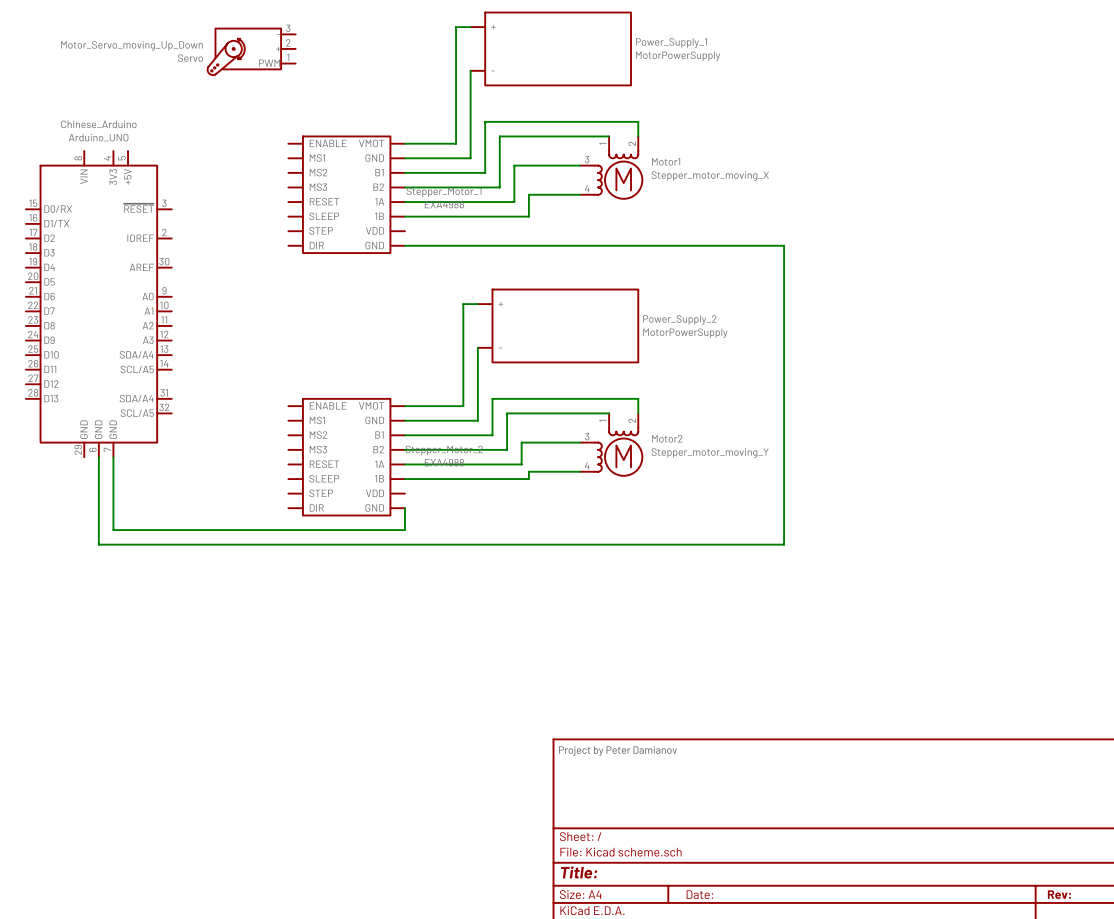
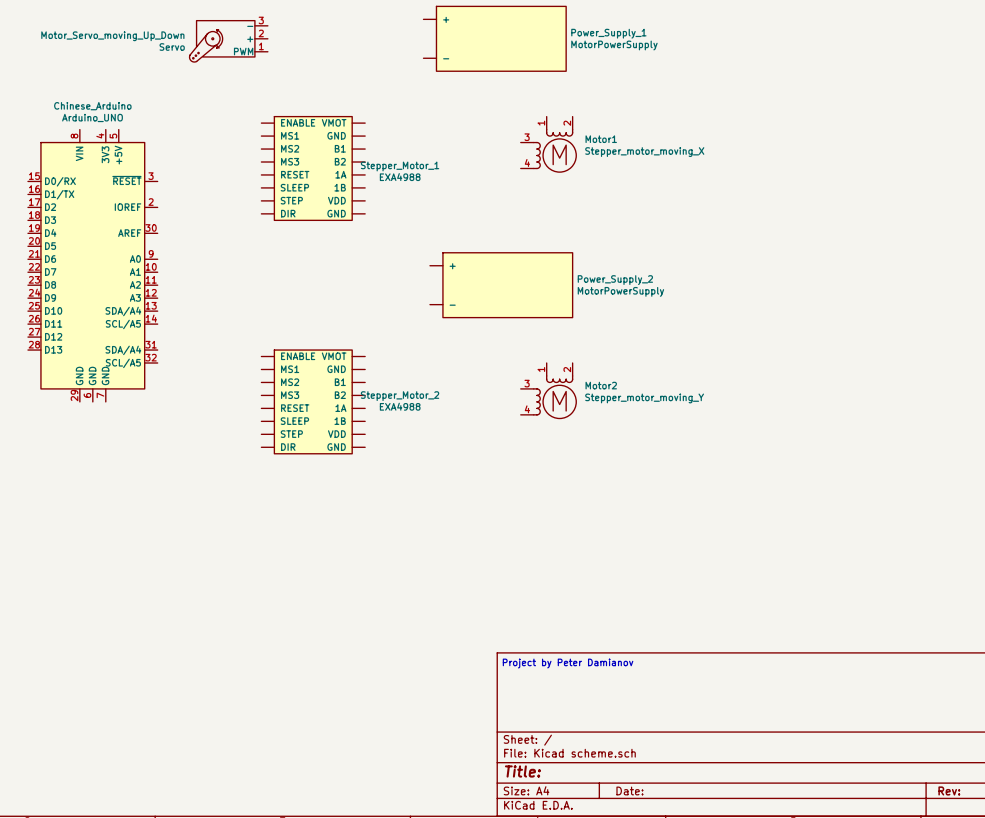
wire: (470, 27) (456, 27) (456, 143) (405, 143) -> none
wire: (470, 70) (470, 158) (405, 158) -> none
wire: (609, 136) (499, 136) (499, 187) (405, 187) -> none
wire: (638, 136) (638, 121) (485, 121) (485, 172) (405, 172) -> none
wire: (579, 165) (514, 165) (514, 202) (405, 202) -> none
wire: (579, 194) (528, 194) (528, 216) (405, 216) -> none
wire: (405, 245) (784, 245) (784, 544) (98, 544) (98, 457) -> none
wire: (477, 304) (463, 304) (463, 406) (405, 406) -> none
wire: (477, 347) (477, 420) (405, 420) -> none
wire: (609, 413) (507, 413) (507, 449) (405, 449) -> none
wire: (638, 413) (638, 398) (492, 398) (492, 435) (405, 435) -> none
wire: (579, 442) (521, 442) (521, 464) (405, 464) -> none
wire: (113, 457) (113, 530) (405, 530) (405, 508) -> none
wire: (579, 471) (528, 471) (528, 479) (405, 479) -> none

